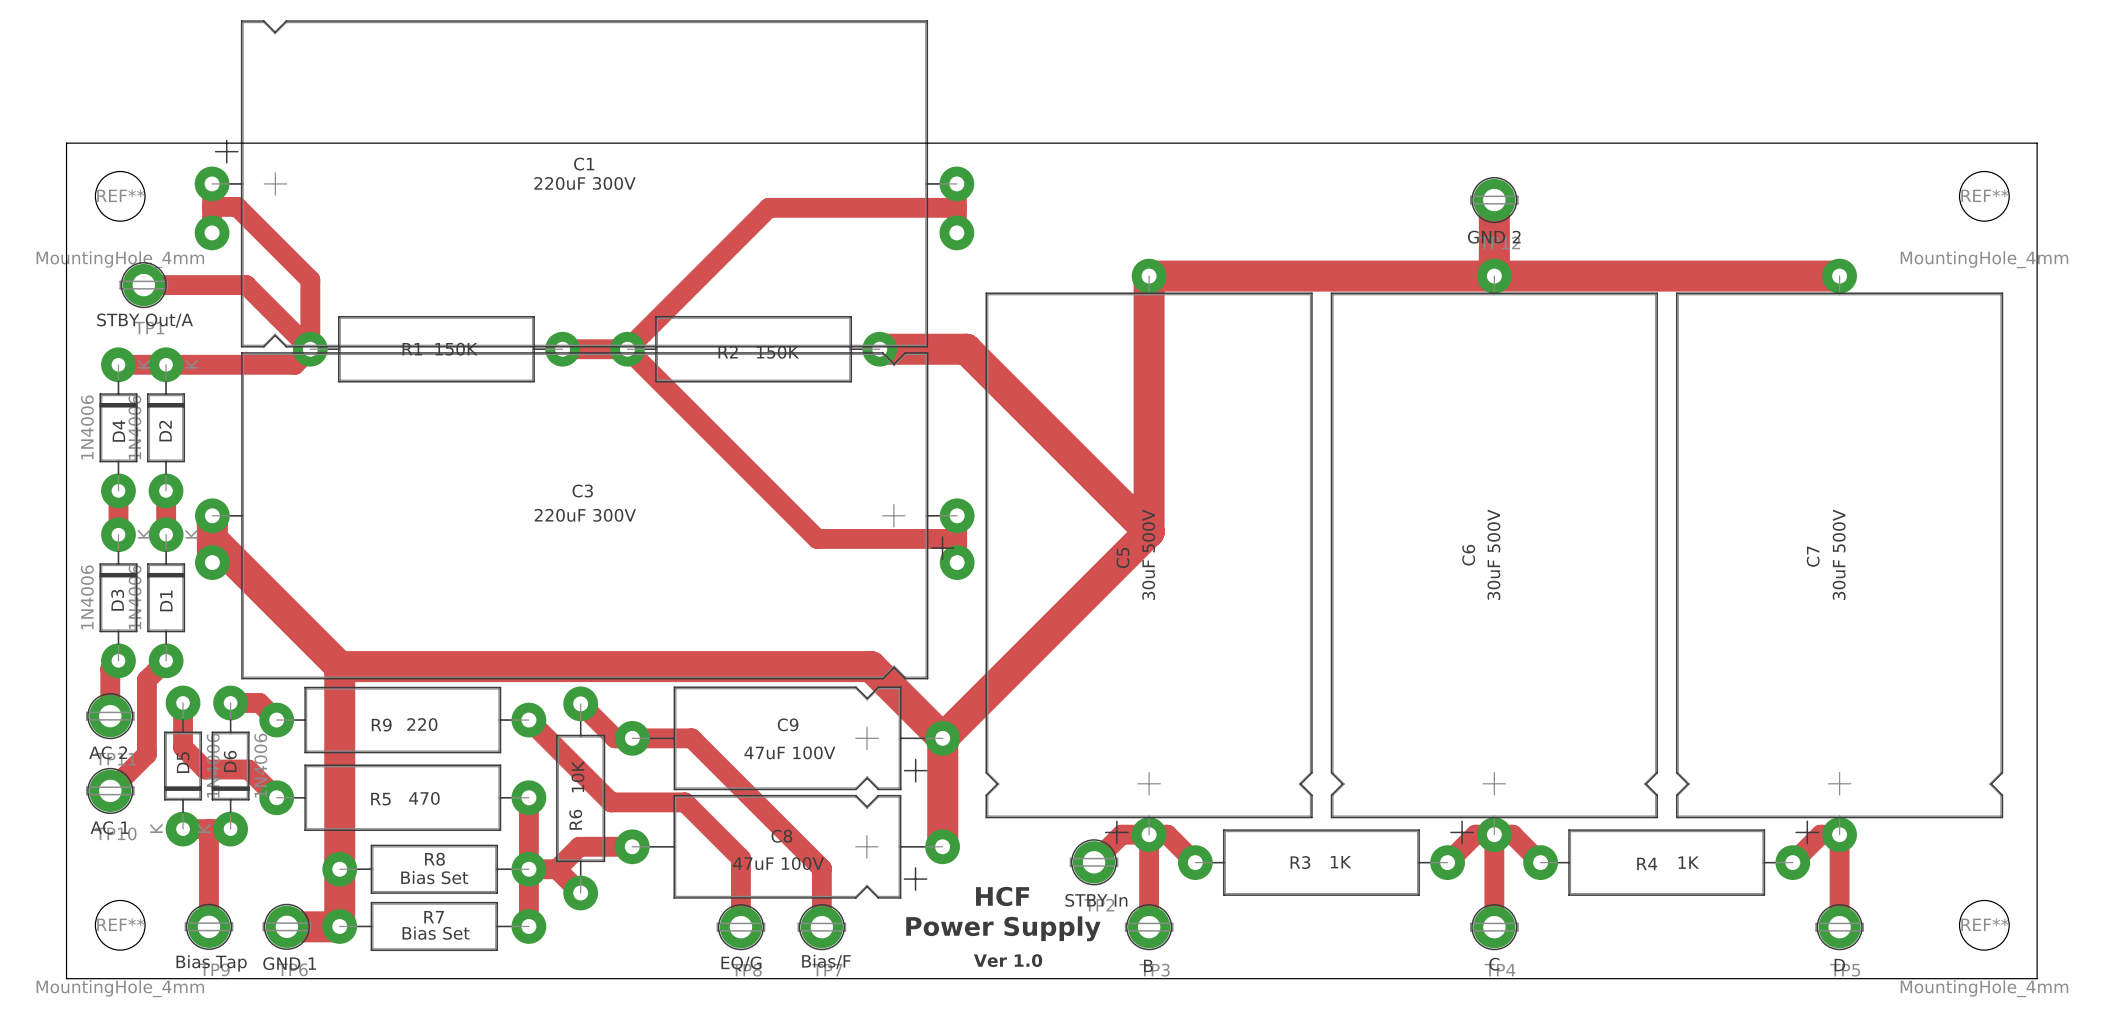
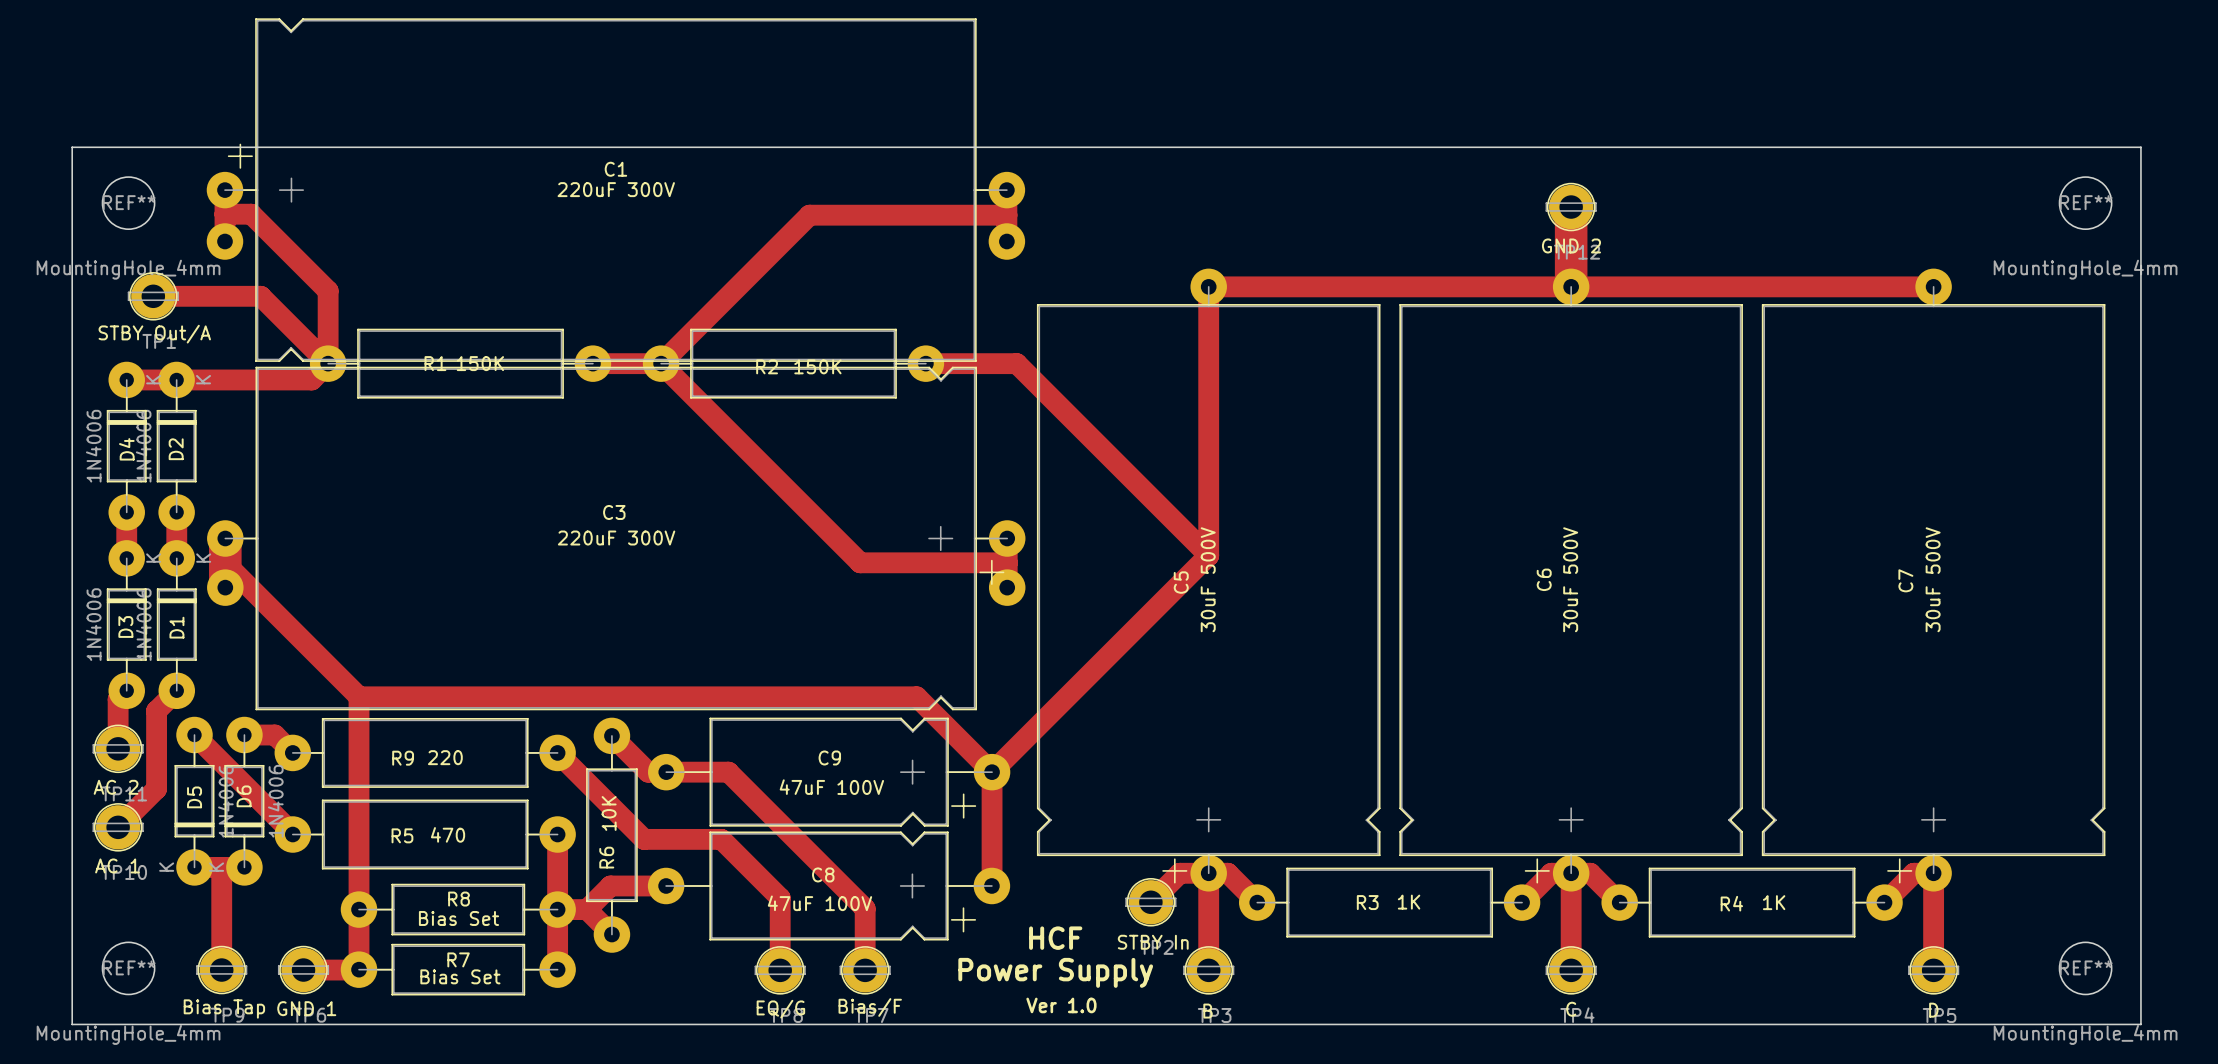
top track width: thick (1839, 276) (1149, 276) (1149, 531) -> thin (1933, 286) (1208, 286) (1208, 555)
top track width: thick (879, 349) (966, 349) (1149, 531) -> thin (925, 363) (1016, 363) (1208, 555)
top track width: thick (1149, 531) (942, 738) -> thin (1208, 555) (992, 772)
top track width: thick (212, 539) (339, 666) -> thin (225, 563) (359, 696)
top track width: thick (339, 666) (339, 926) (286, 926) -> thin (359, 696) (359, 969) (303, 970)
top track width: thick (339, 666) (870, 666) (942, 738) -> thin (359, 696) (916, 696) (992, 772)
top track: (183, 702) (183, 747) (205, 769) (248, 769) (276, 797) -> (194, 735) (292, 834)
top track width: thick (942, 738) (942, 846) -> thin (992, 772) (992, 885)

